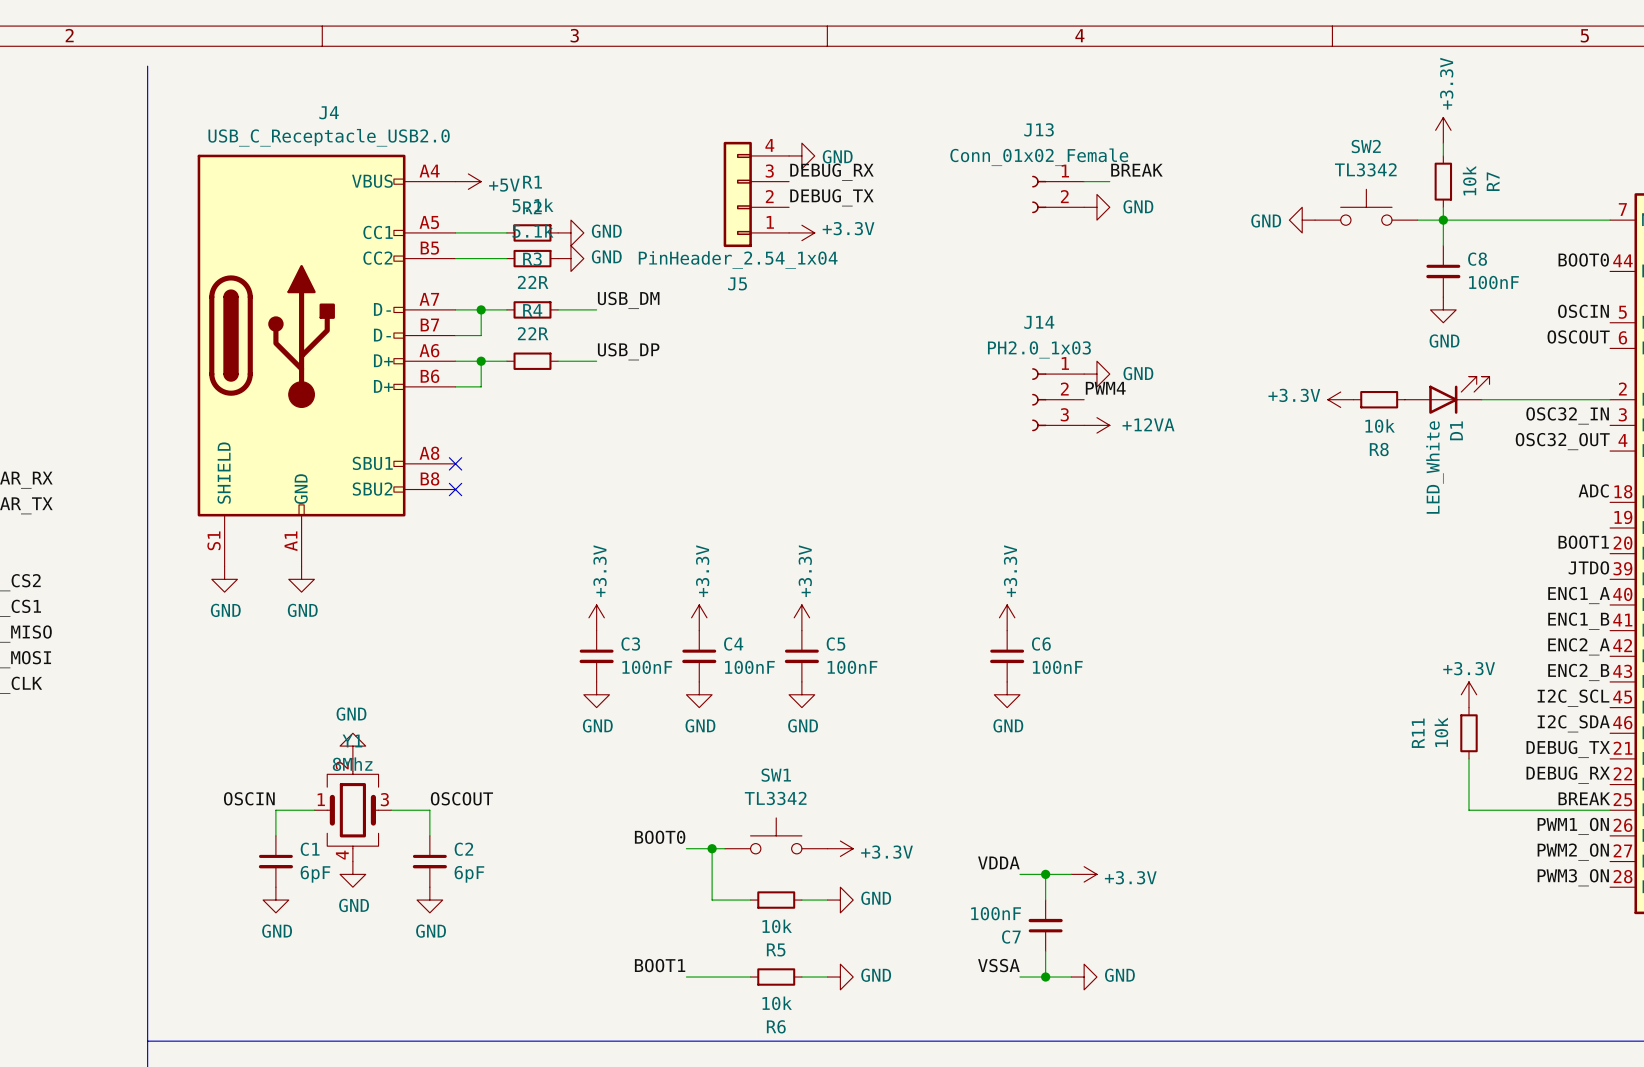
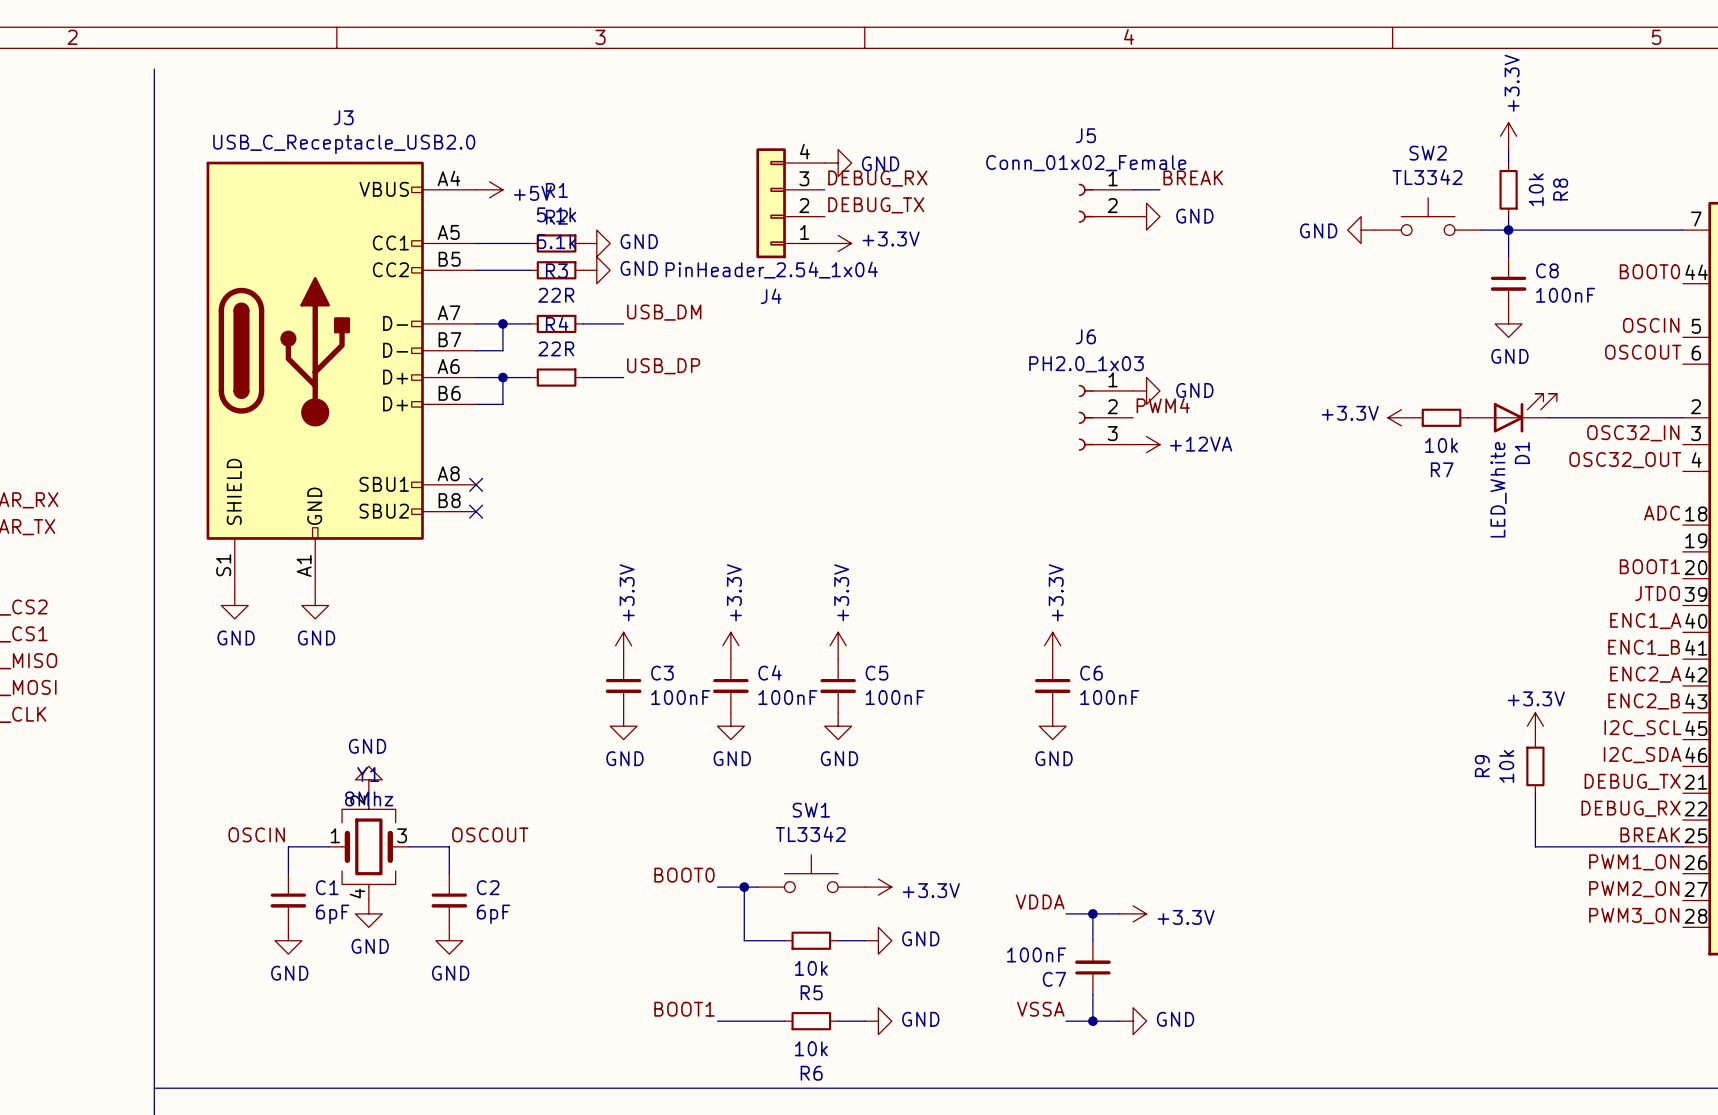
J4 name: J4 (329, 112) -> J3 (343, 117)
J13 name: J13 (1039, 129) -> J5 (1085, 135)
R7 name: R7 (1493, 181) -> R8 (1560, 189)
J5 name: J5 (737, 283) -> J4 (771, 296)
J14 name: J14 (1039, 322) -> J6 (1085, 336)
R8 name: R8 (1379, 449) -> R7 (1442, 469)
R11 name: R11 (1418, 733) -> R9 (1482, 766)

